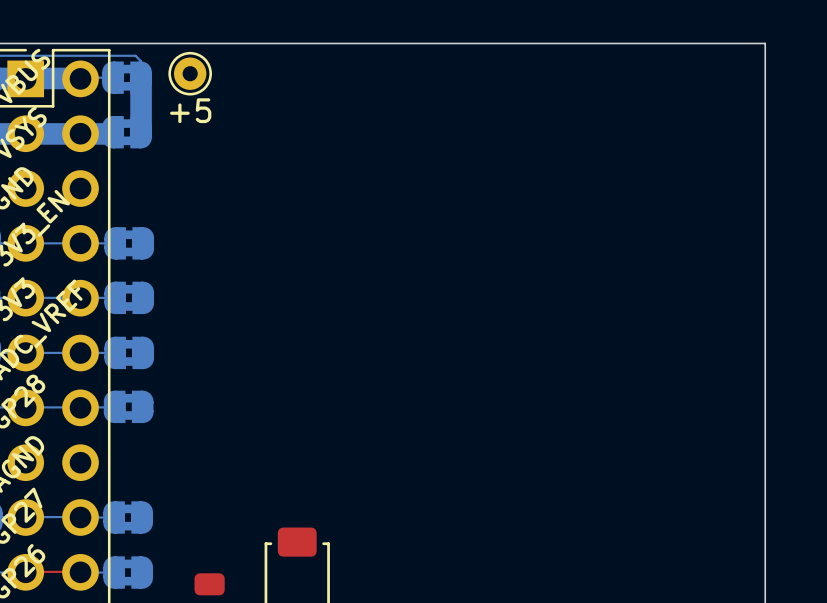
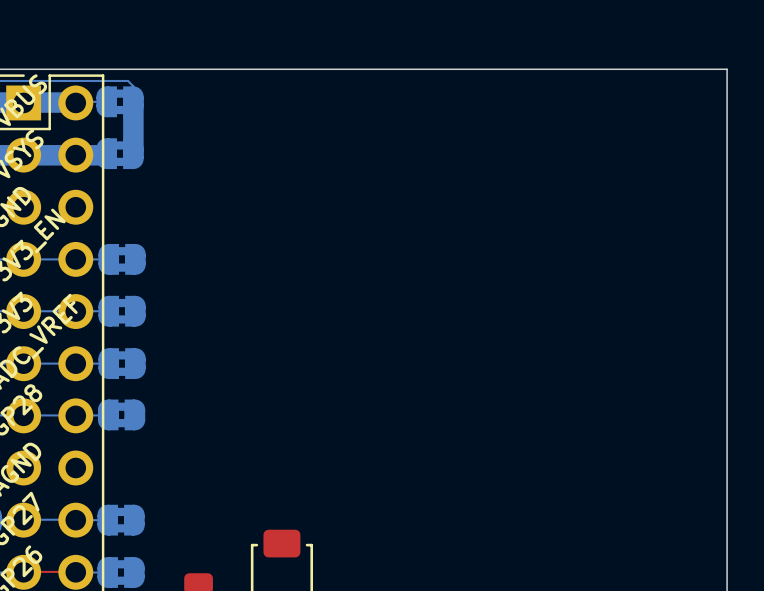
part: +5 (190, 73) -> none

